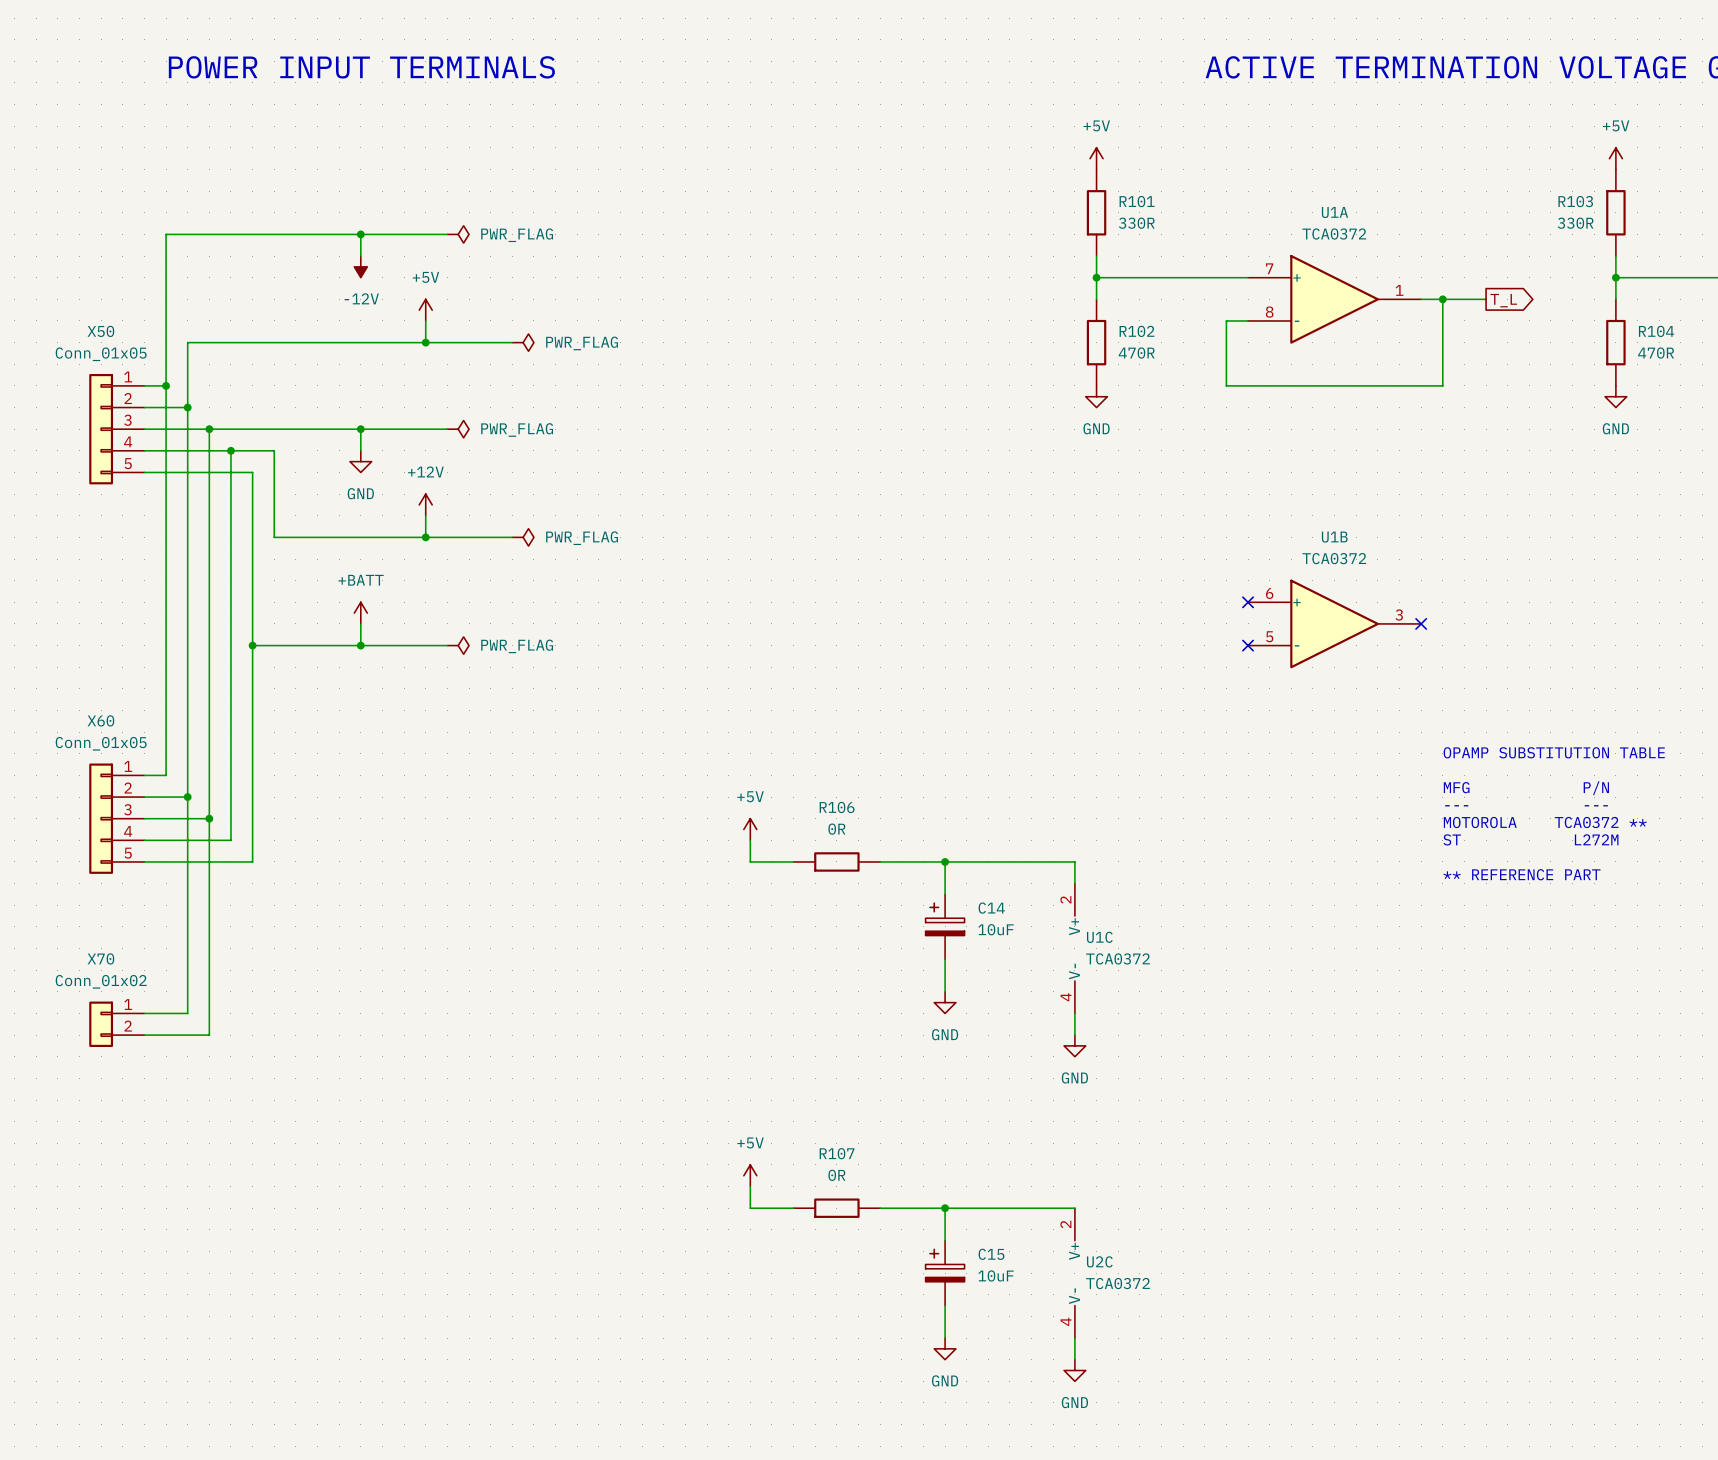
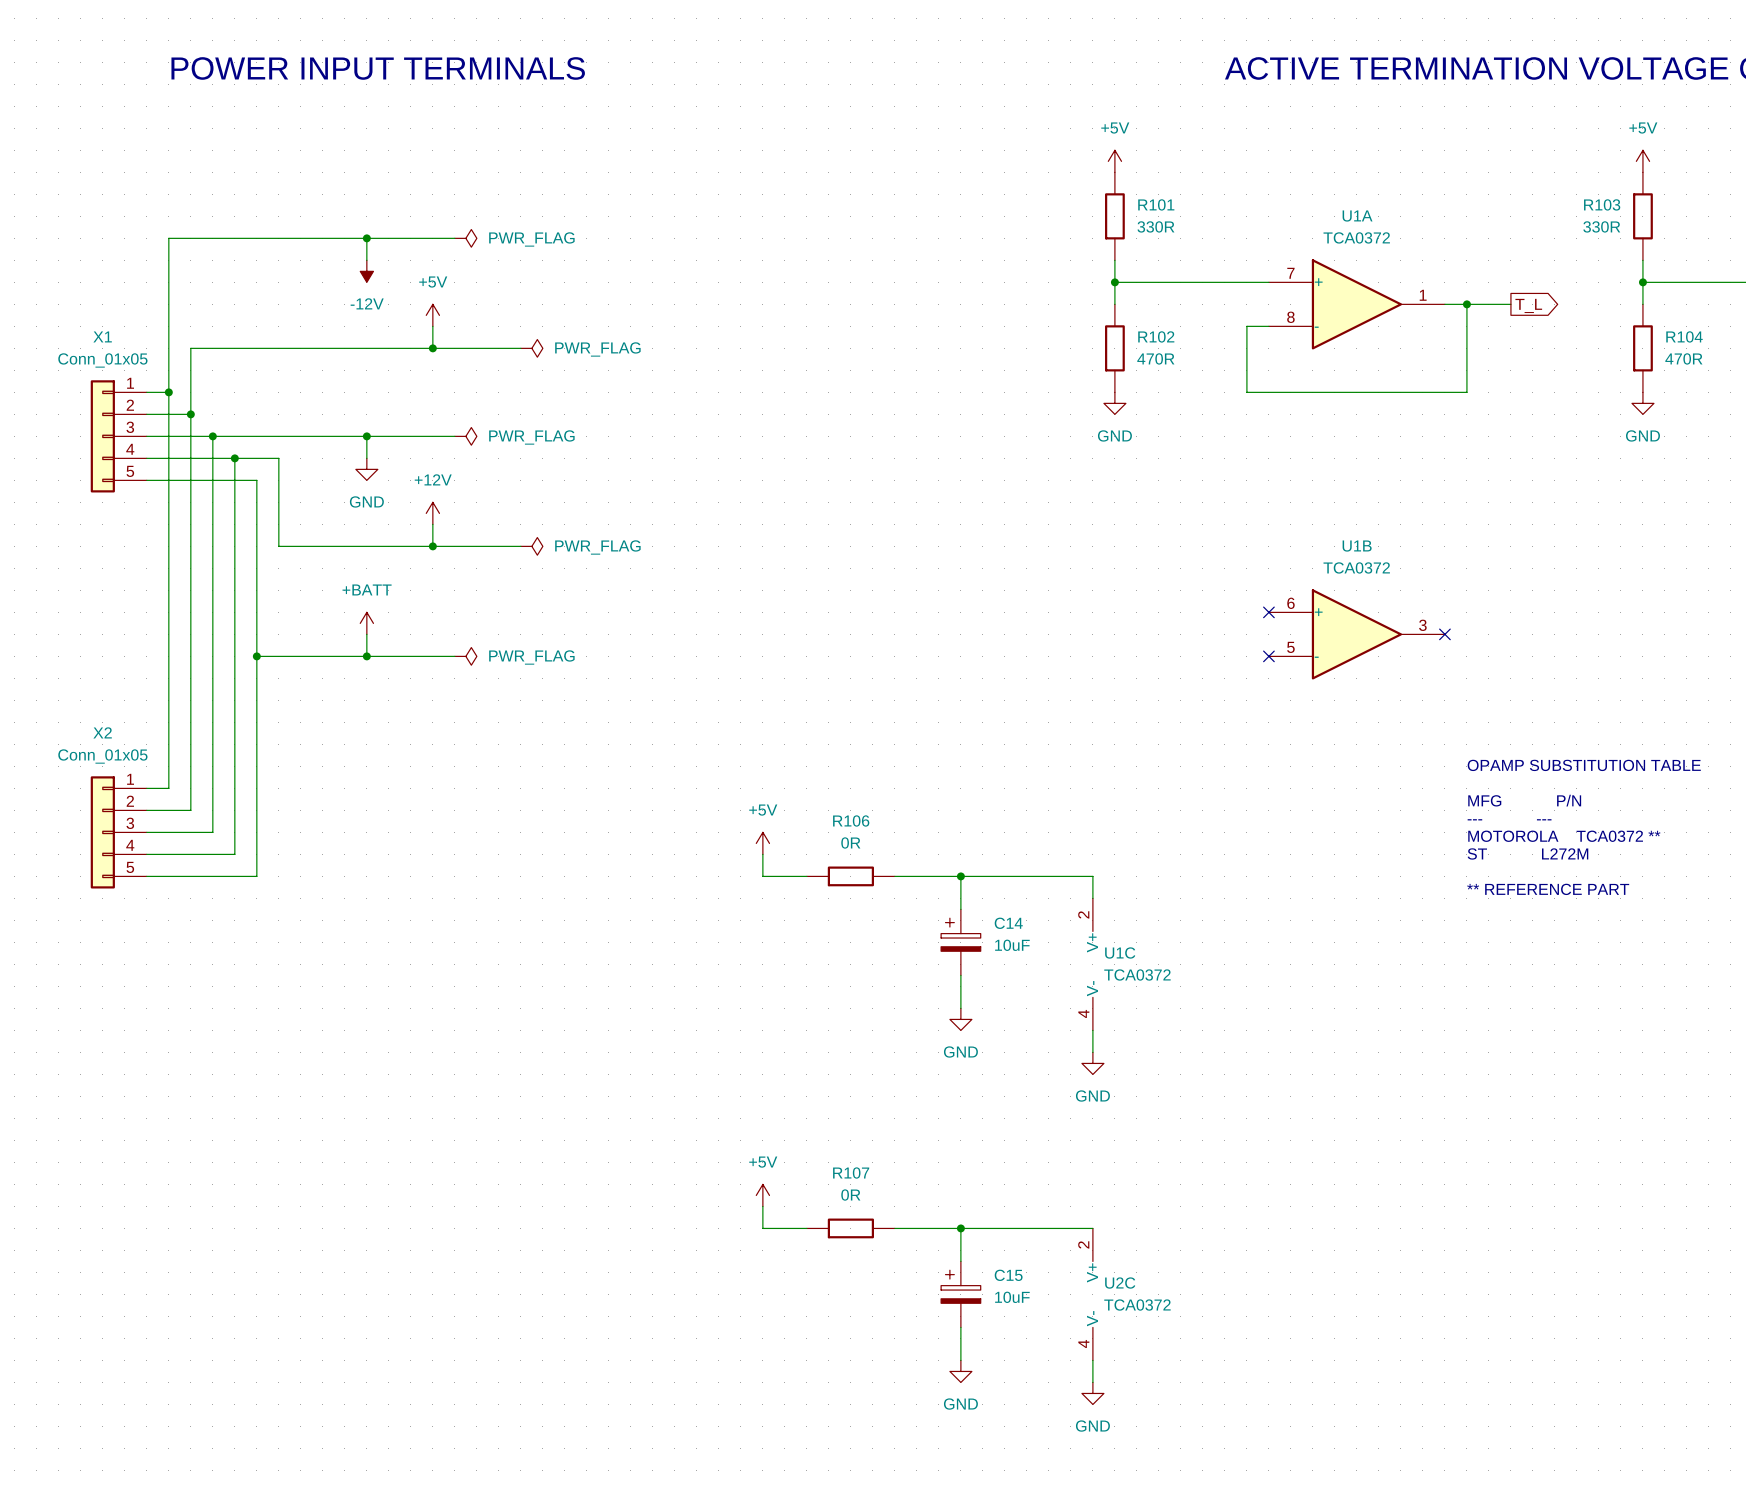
X50 name: X50 (100, 331) -> X1 (102, 336)
X60 name: X60 (100, 720) -> X2 (102, 732)
wire: (187, 797) (187, 1013) (144, 1013) -> none
junction: (187, 797) -> none
wire: (209, 818) (209, 1035) (144, 1035) -> none
junction: (209, 818) -> none
X70: Conn_01x02 (116, 1024) -> none

